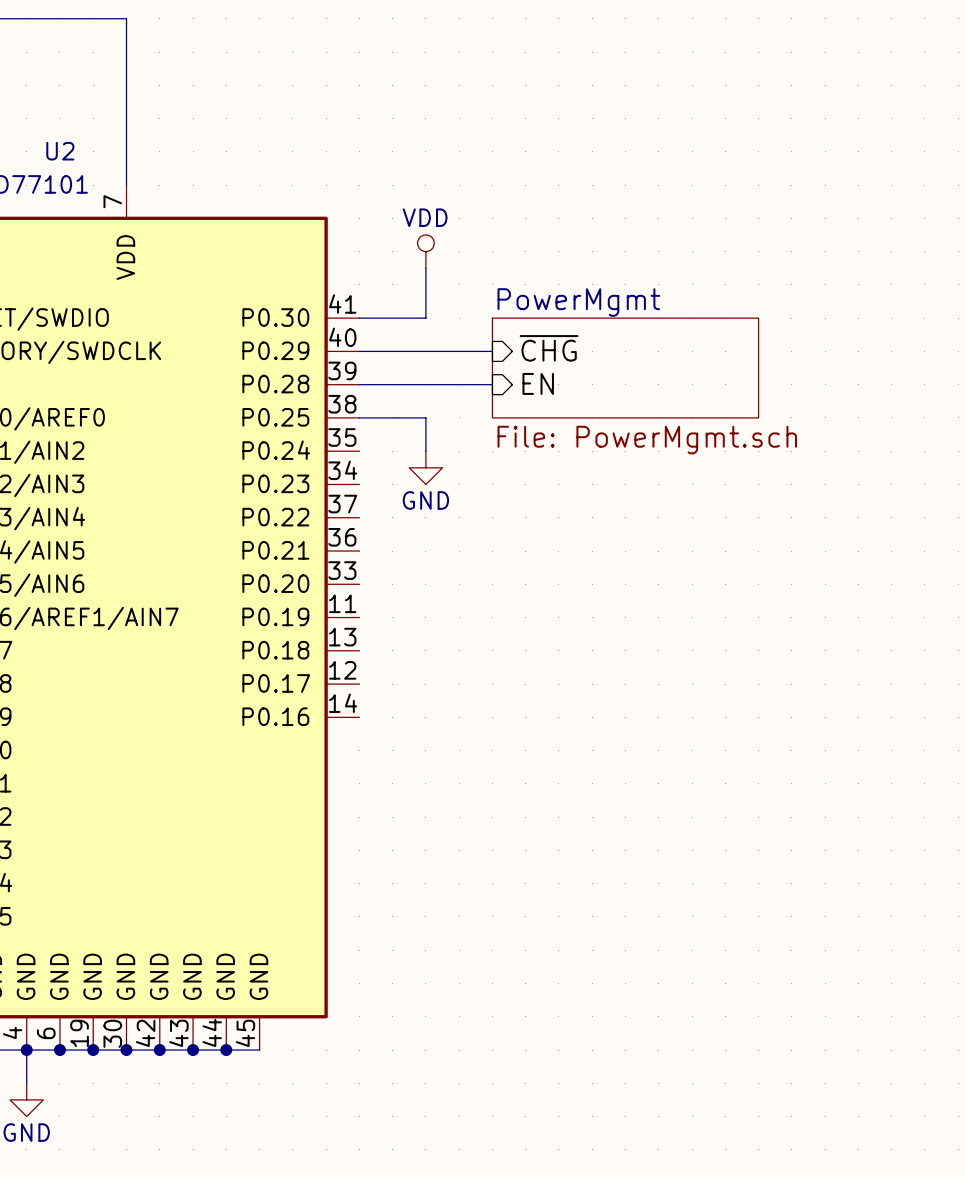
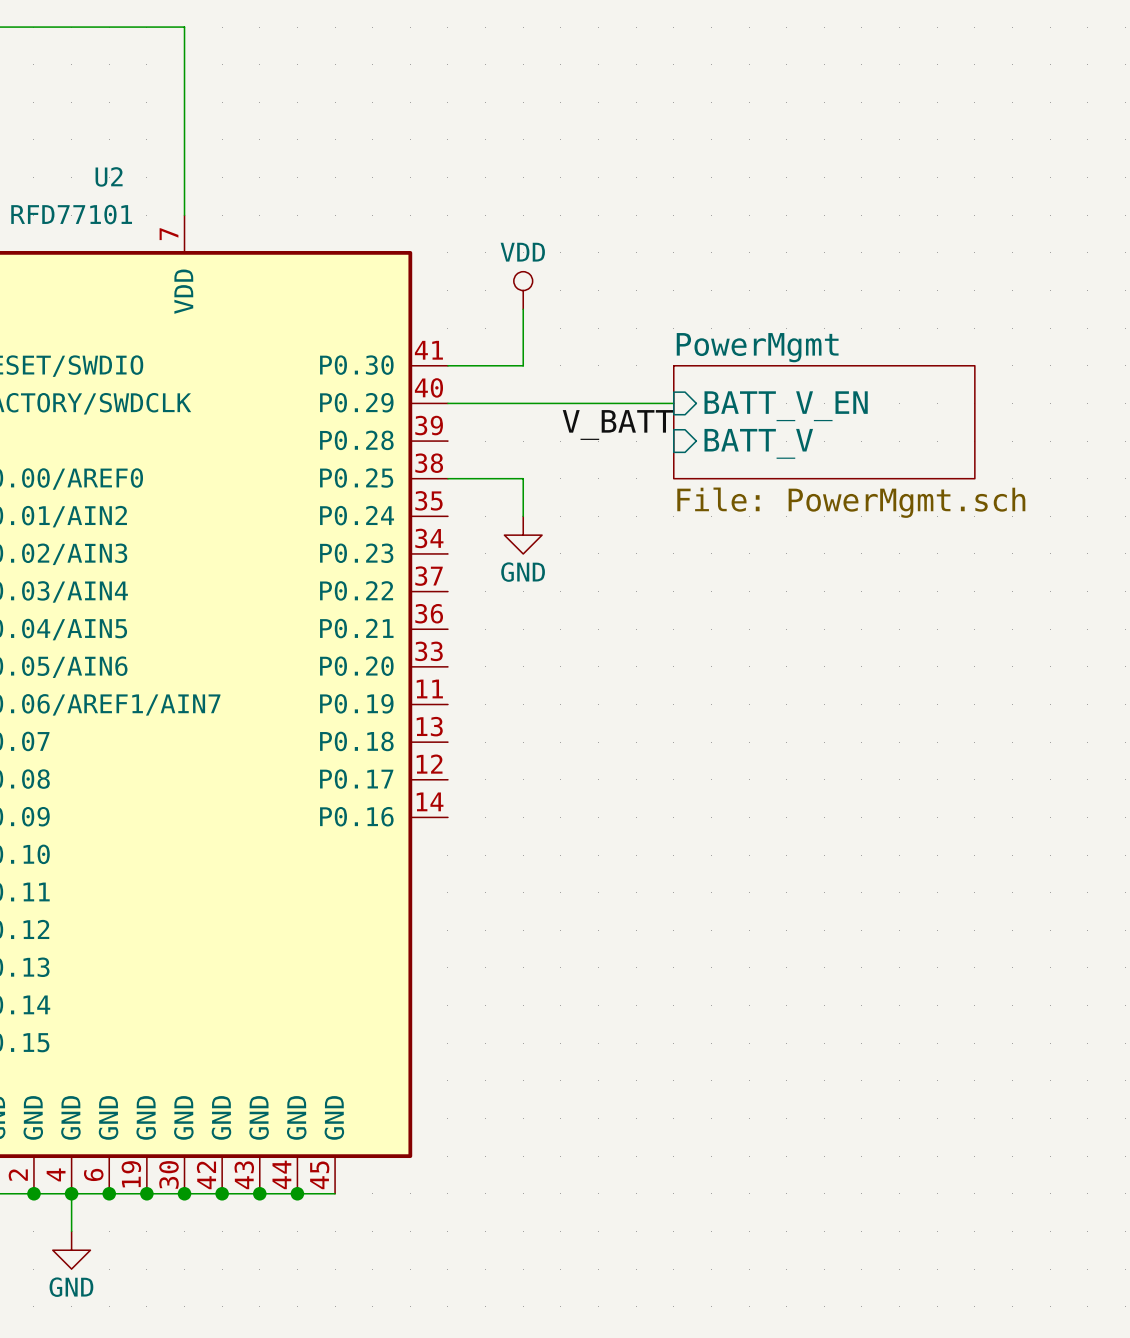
sheet pin: ~{CHG} (549, 348) -> none
wire: none -> (598, 403) (673, 403)
sheet pin: none -> BATT_V_EN (786, 406)
label: none -> V_BATT (617, 425)
sheet PowerMgmt position: (625, 368) -> (824, 422)
sheet pin: EN (538, 383) -> none
wire: (359, 384) (492, 384) -> none
sheet pin: none -> BATT_V (758, 443)

